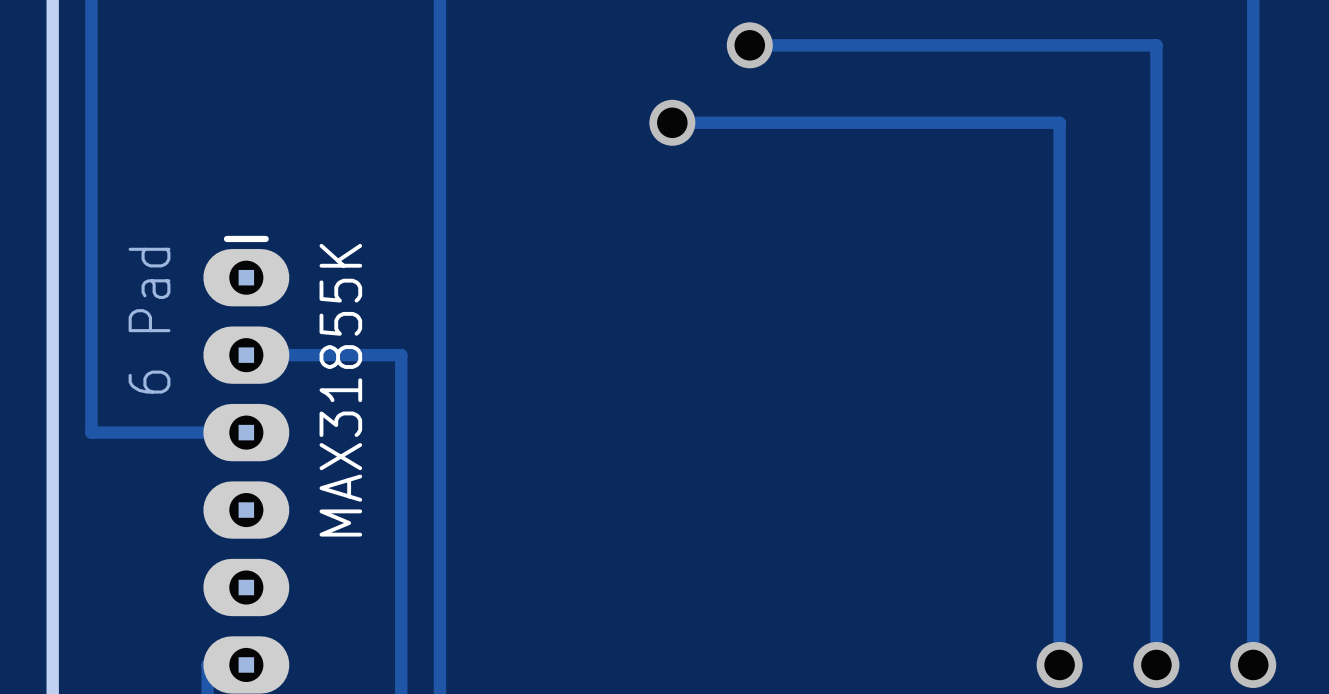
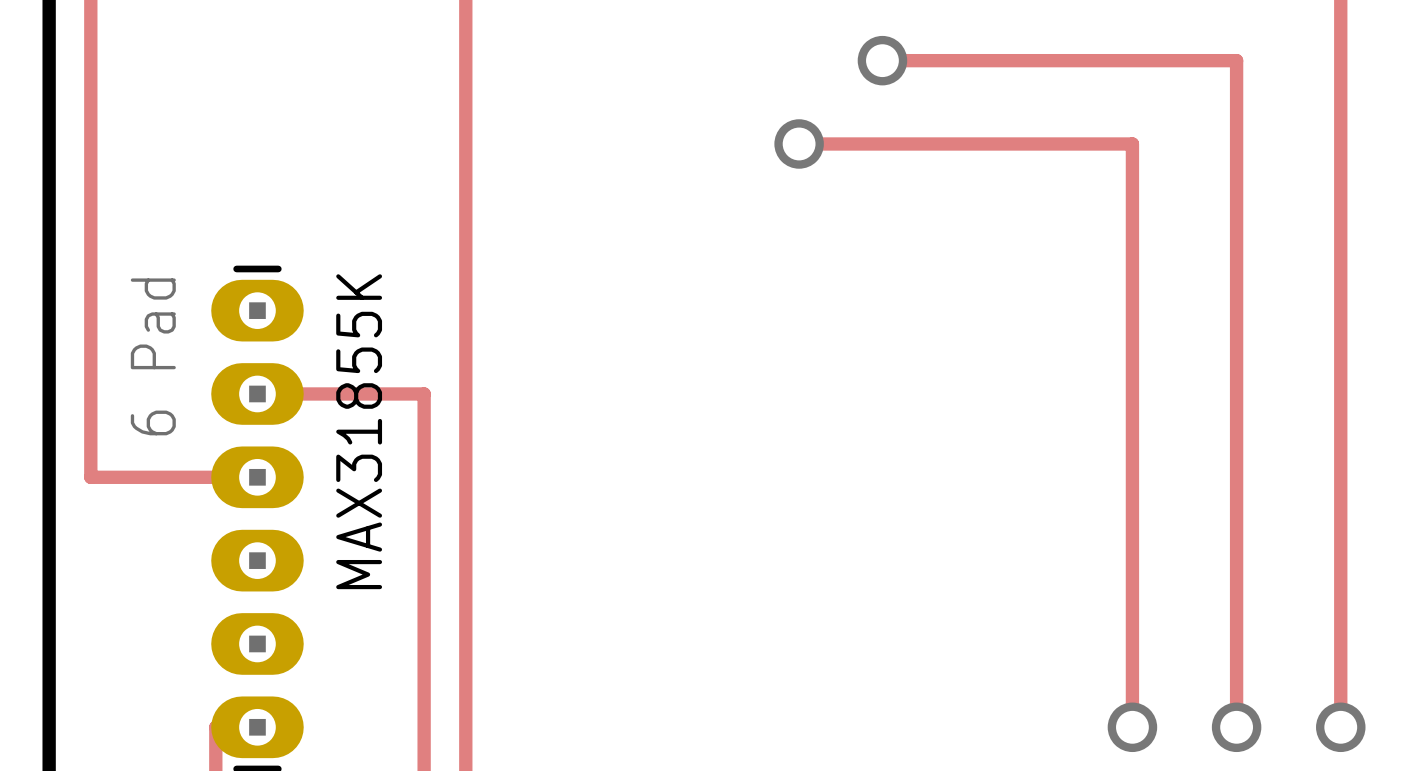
track: (749, 45) (827, 45) -> none
via: (749, 45) -> none
via: none -> (882, 60)
track: (672, 122) (749, 122) -> none
via: (672, 122) -> none
via: none -> (799, 143)

